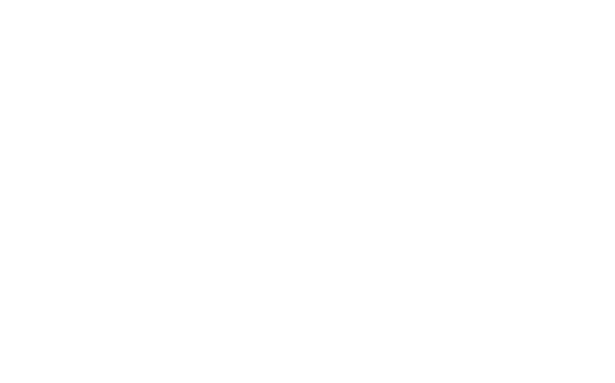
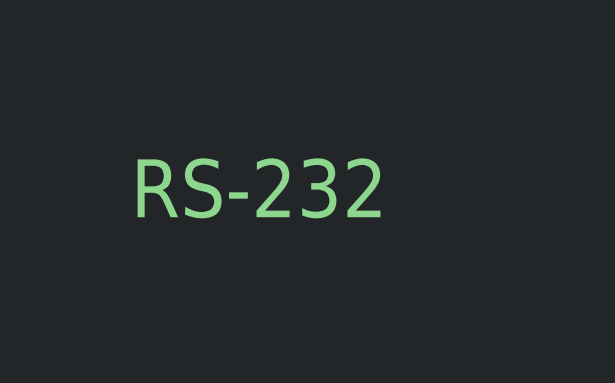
text: none -> RS-232 (259, 188)

